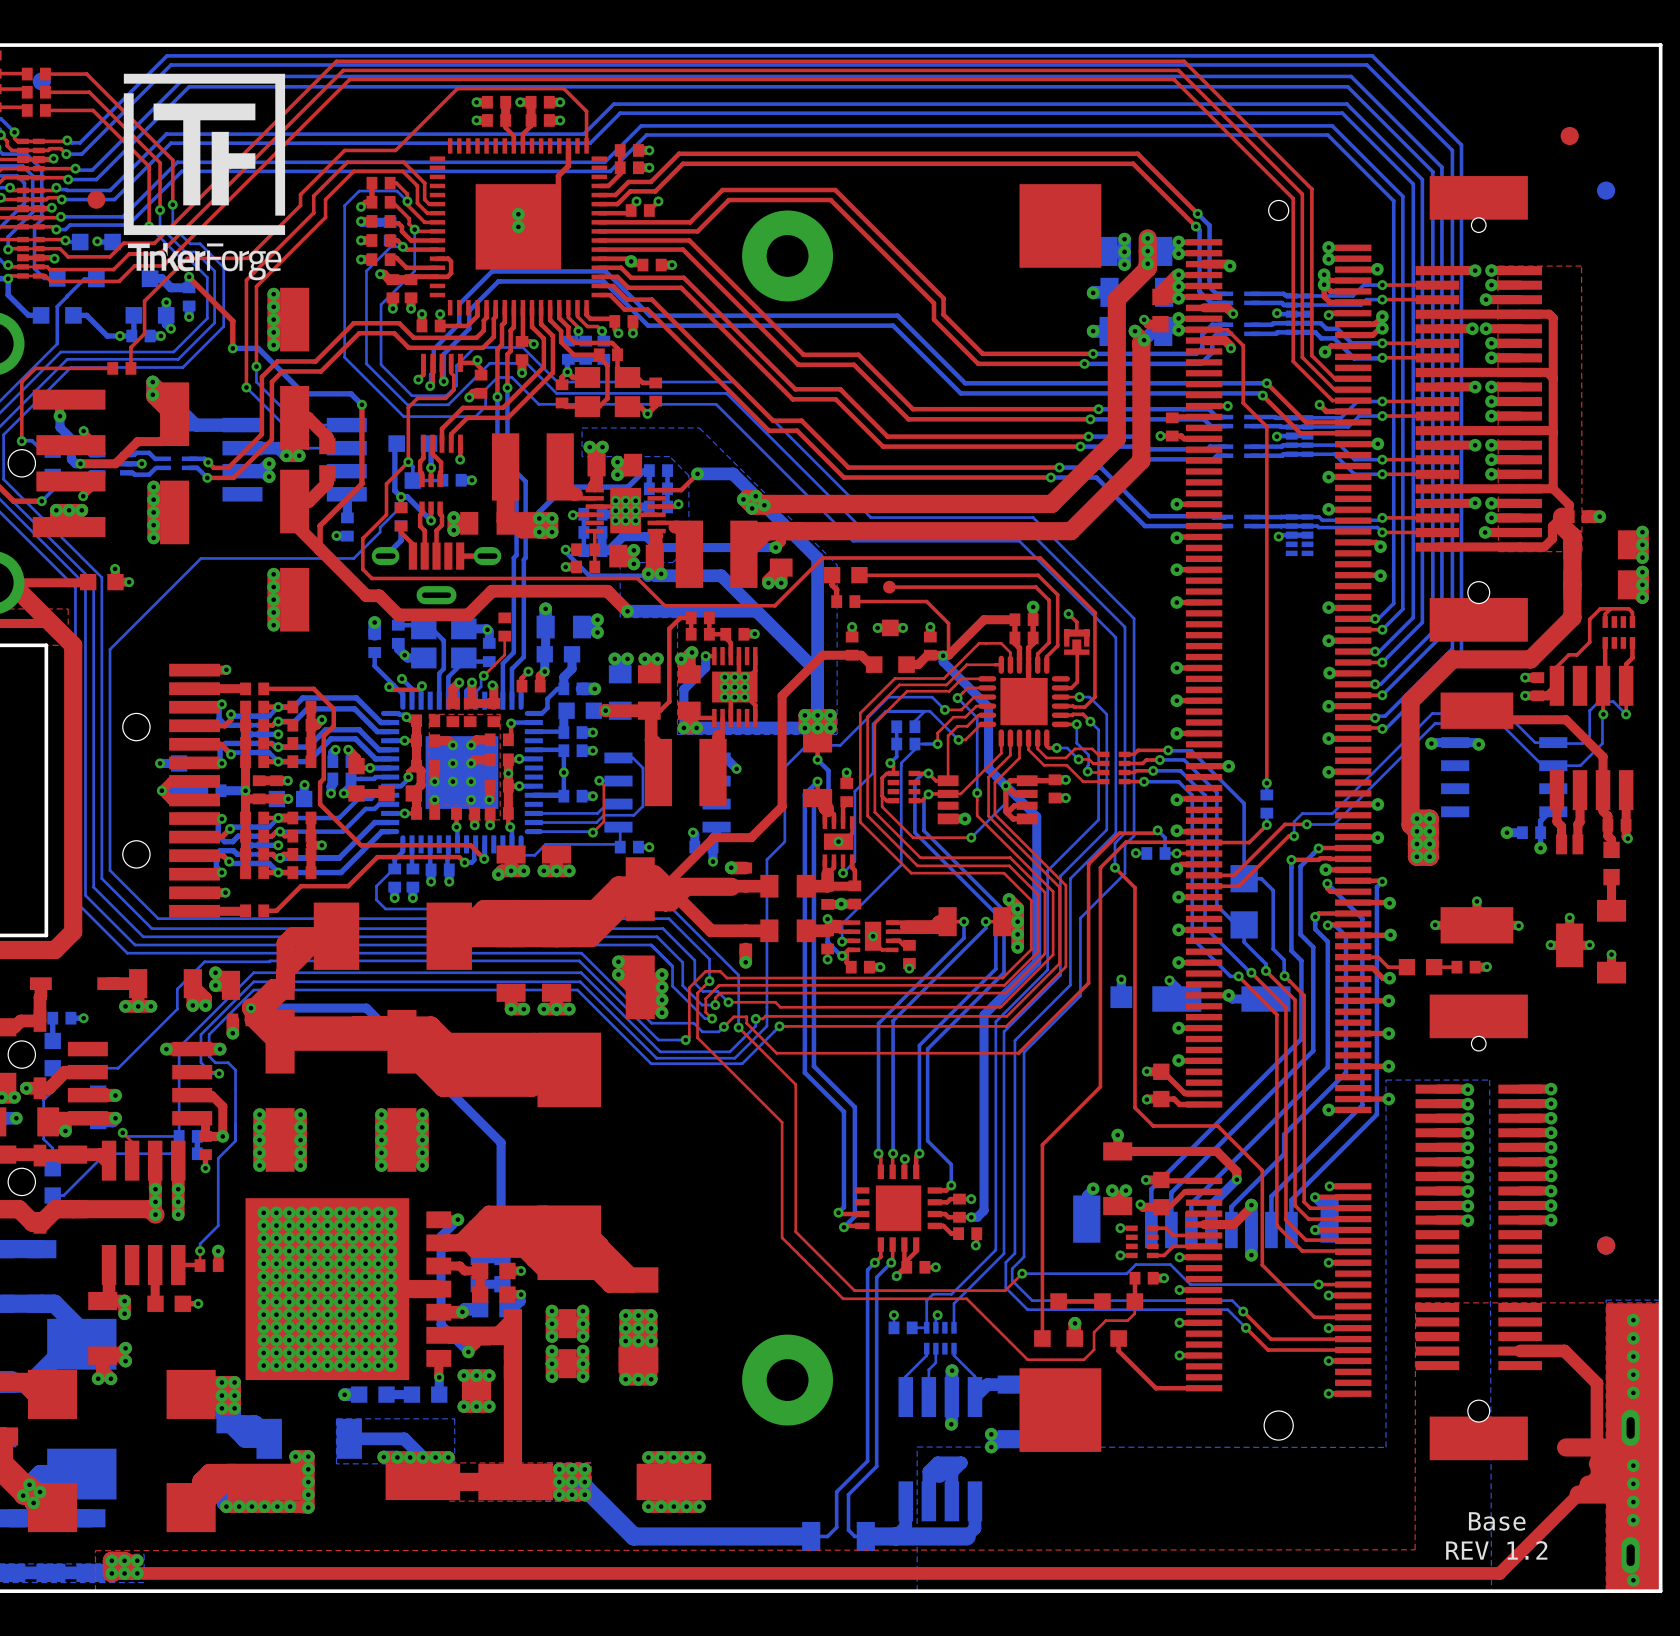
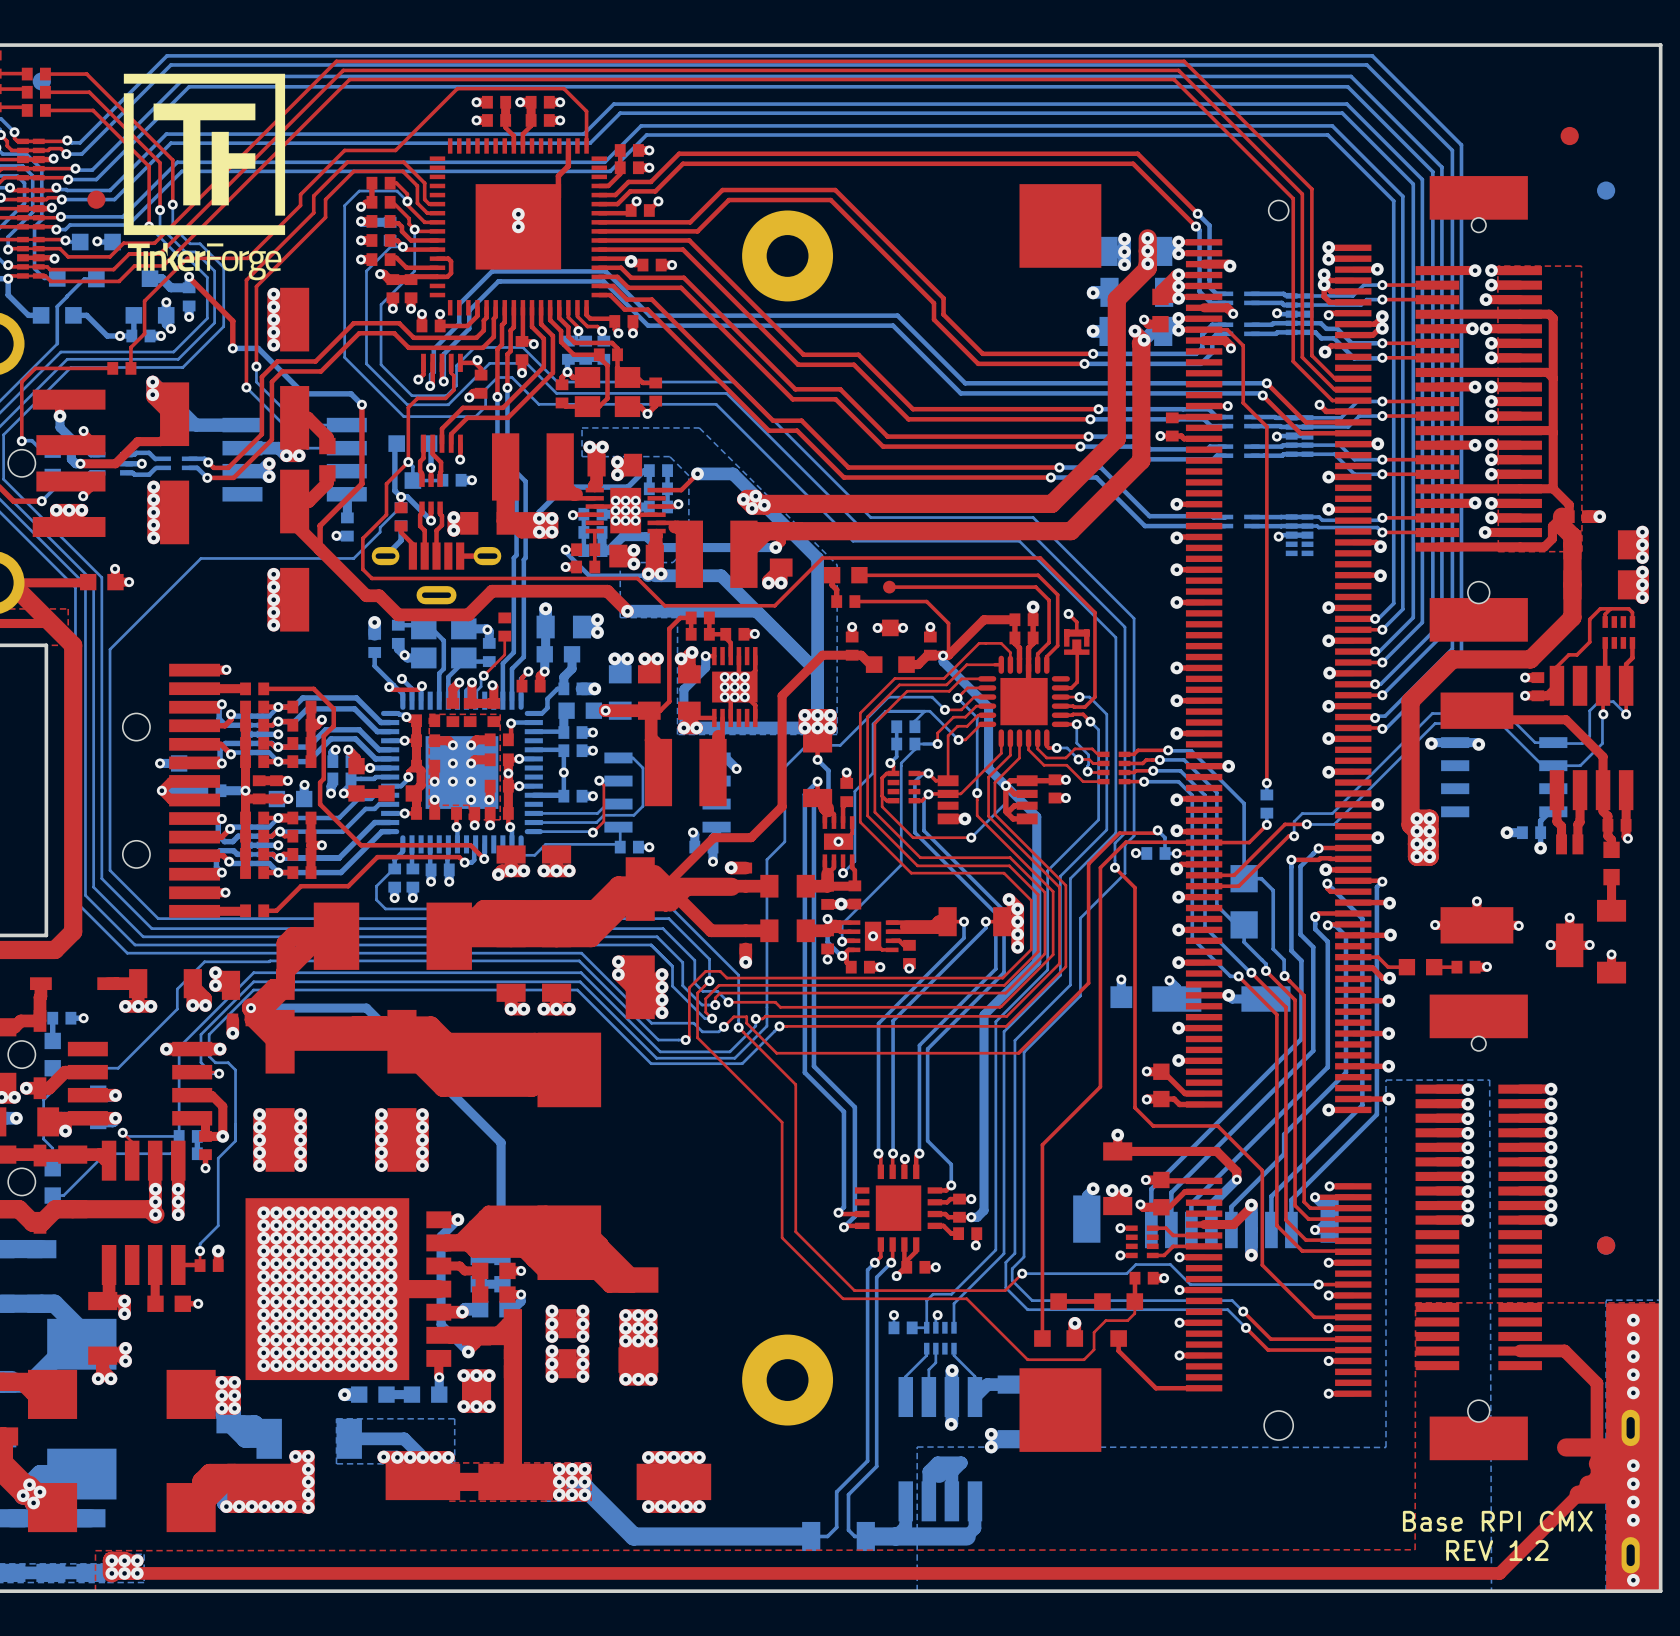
text: Base (1497, 1521) -> Base RPI CMX (1497, 1521)

